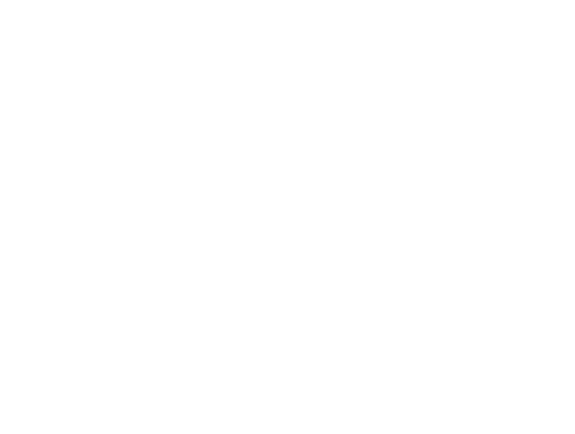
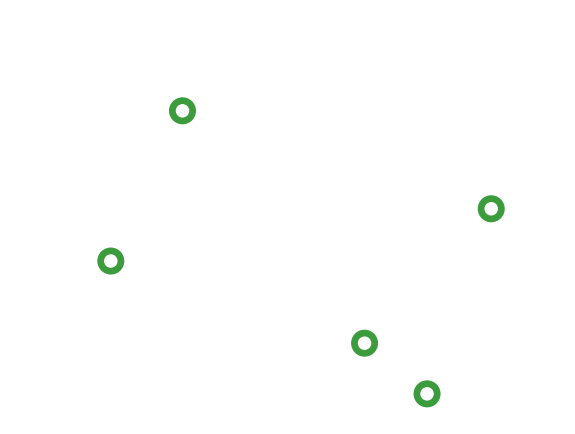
via: none -> (182, 110)
via: none -> (491, 208)
via: none -> (110, 261)
via: none -> (364, 343)
via: none -> (427, 393)

